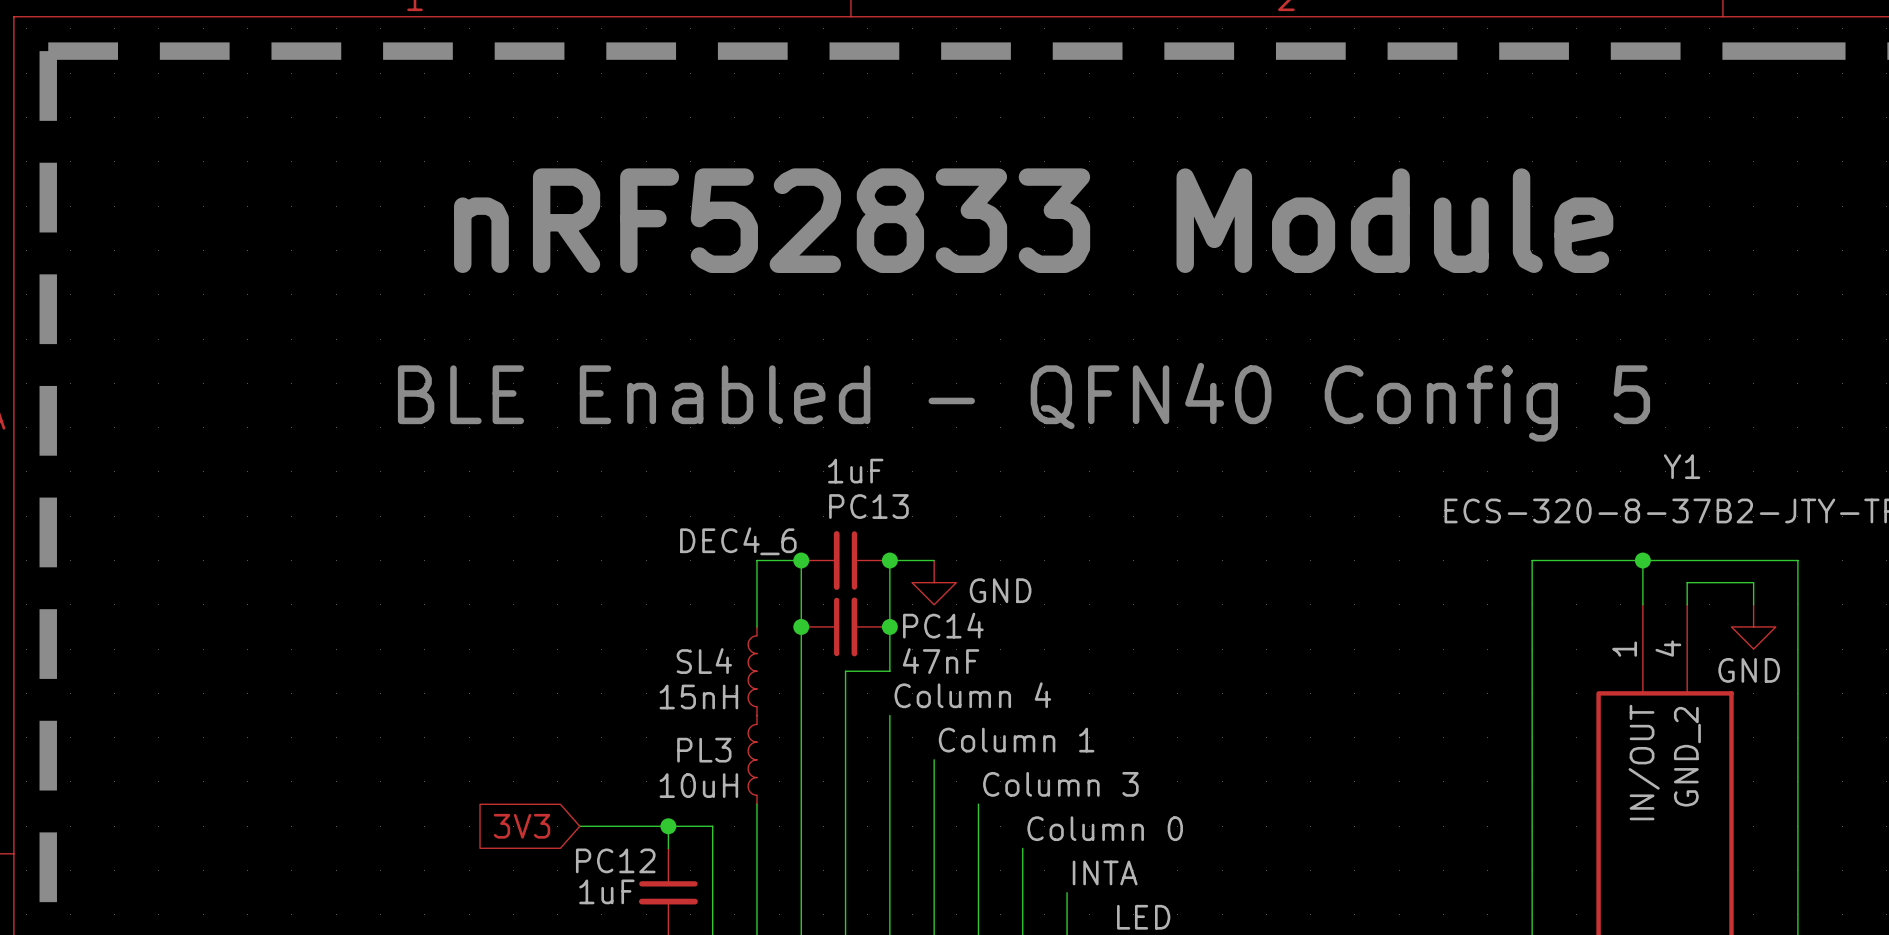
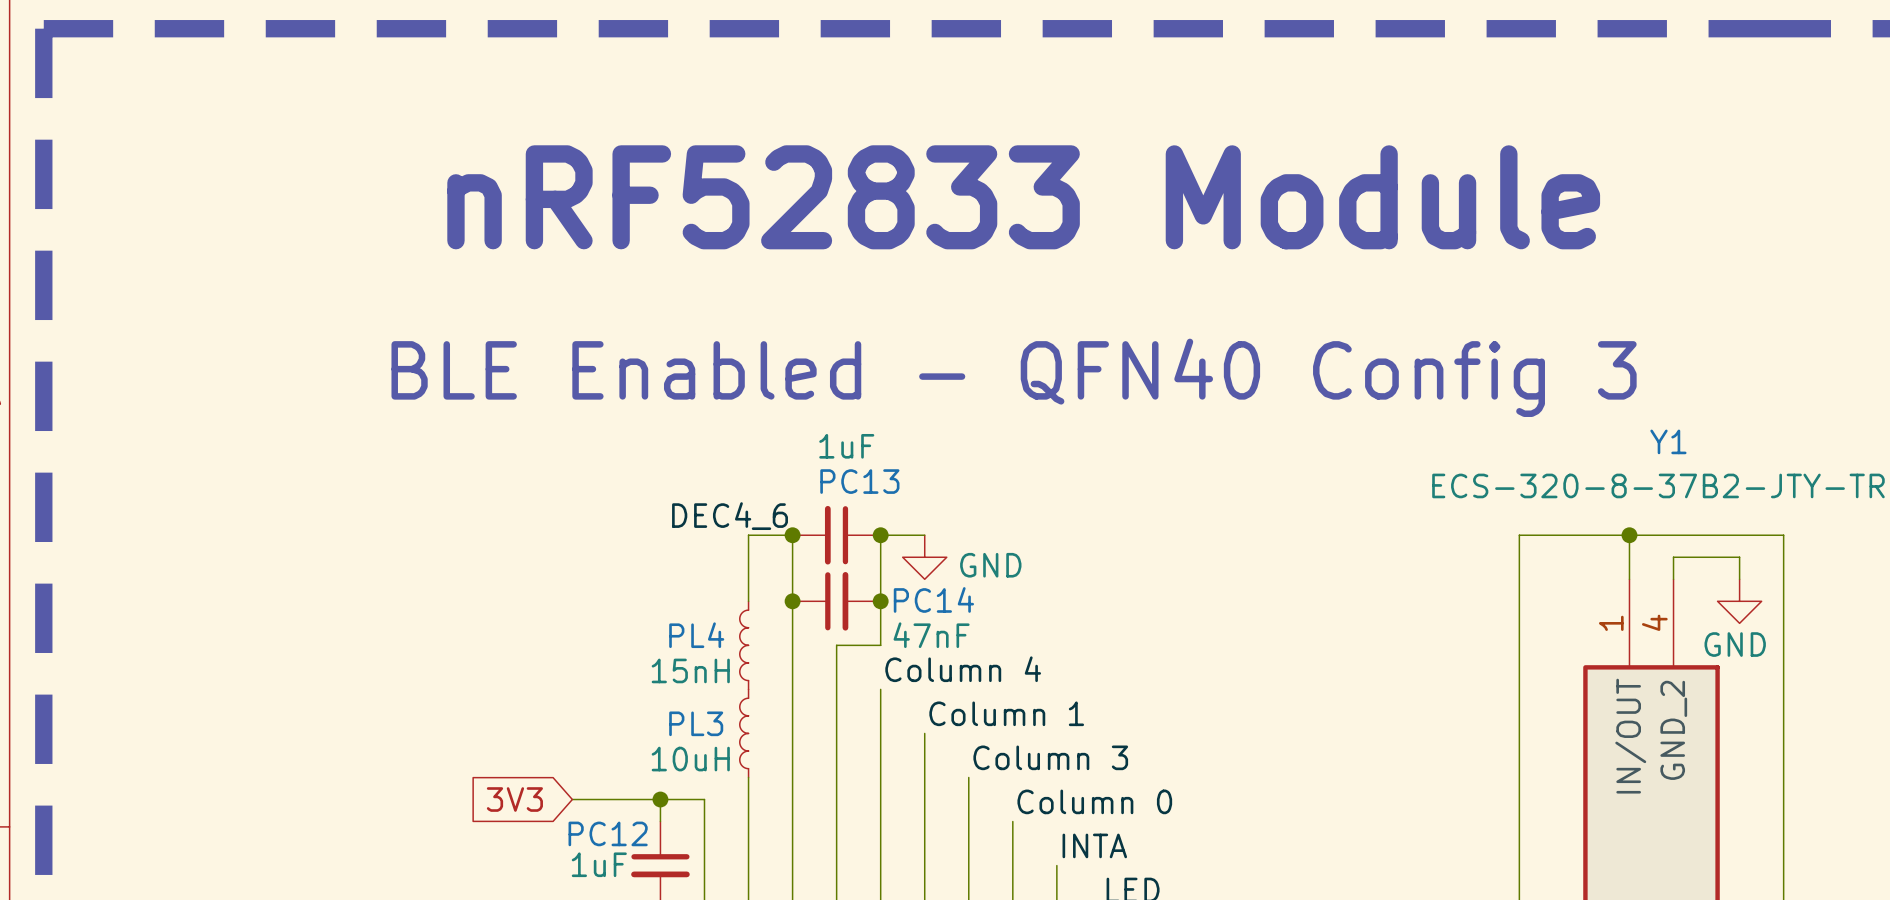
text: BLE Enabled - QFN40 Config 5 (1023, 402) -> BLE Enabled - QFN40 Config 3 (1014, 377)
SL4 name: SL4 (704, 661) -> PL4 (696, 635)

